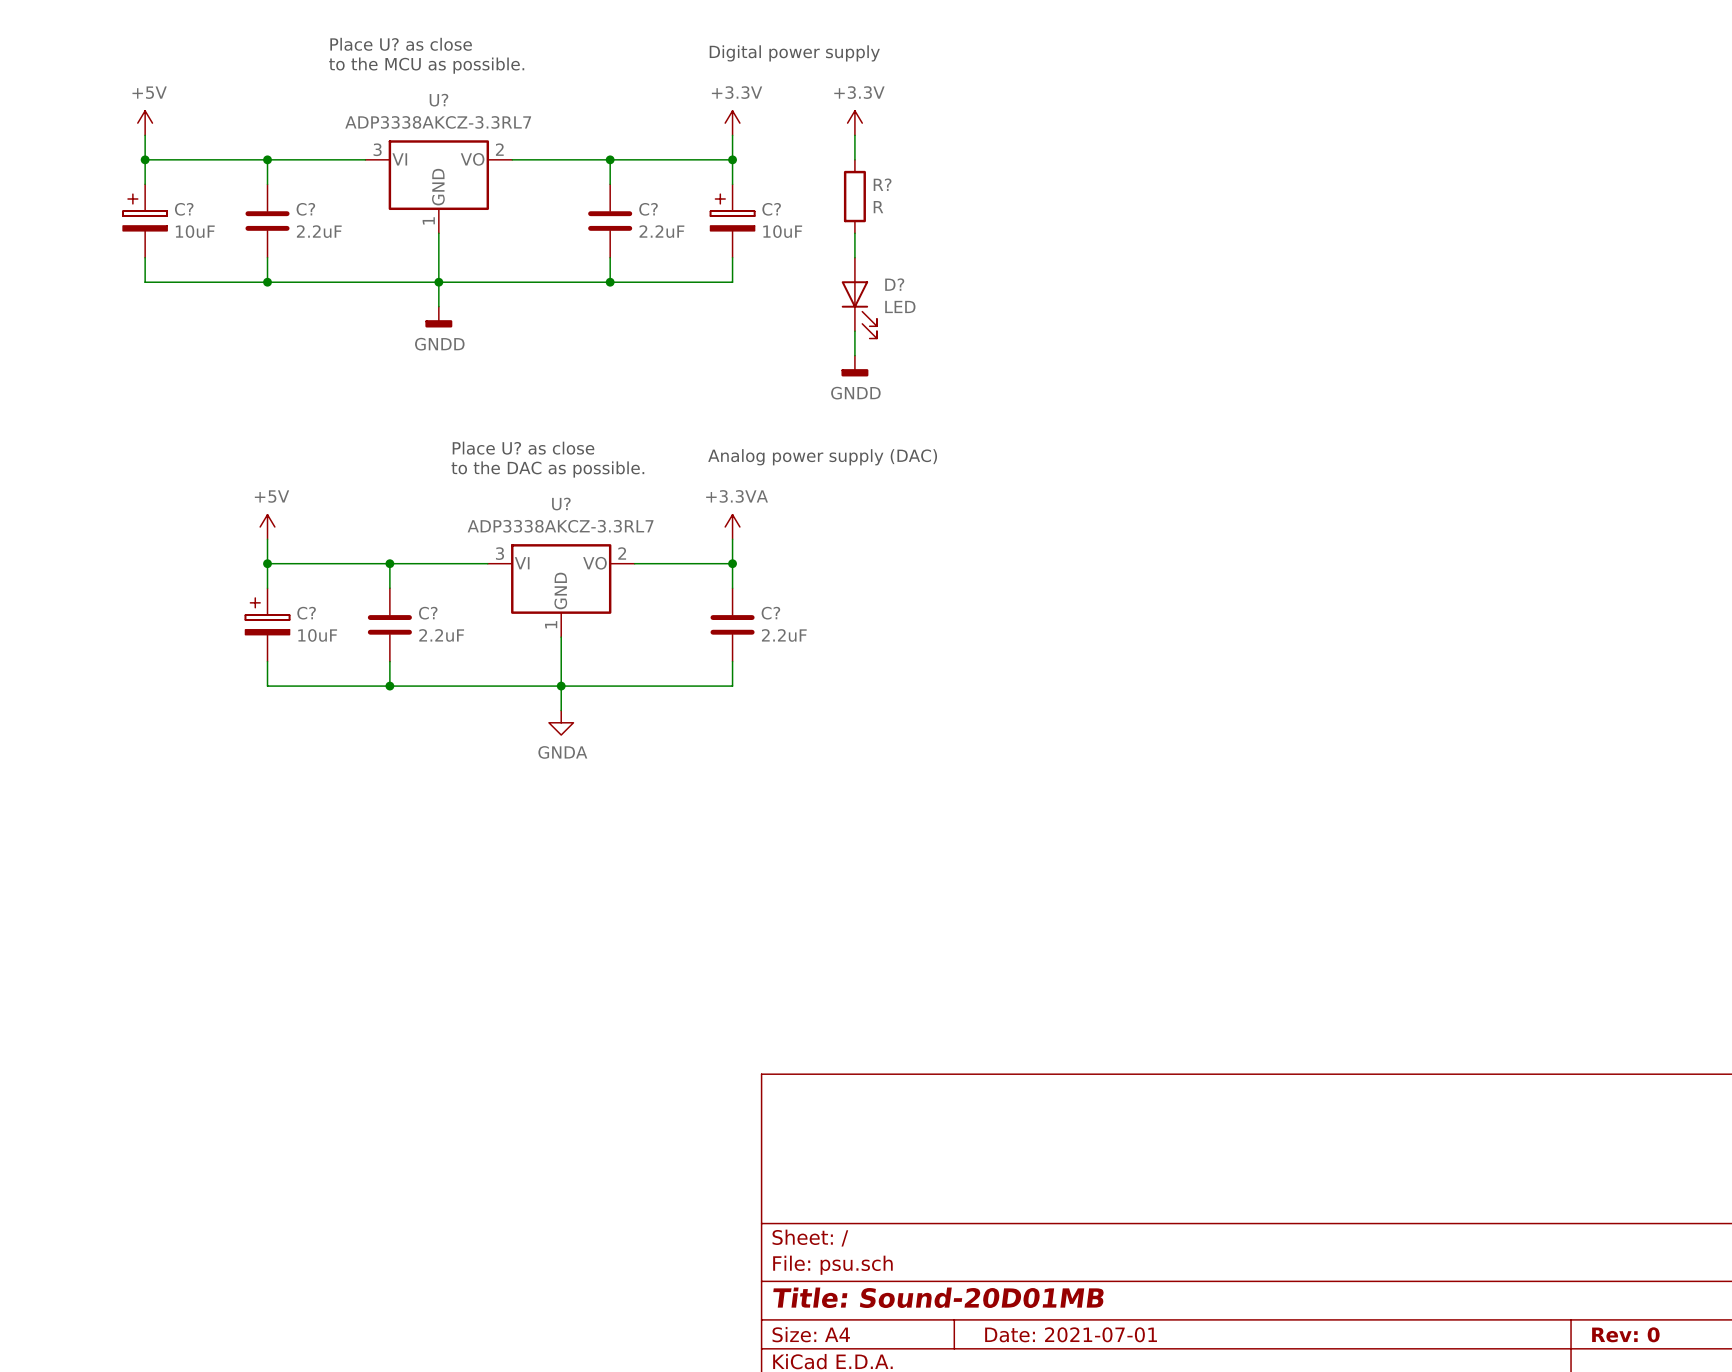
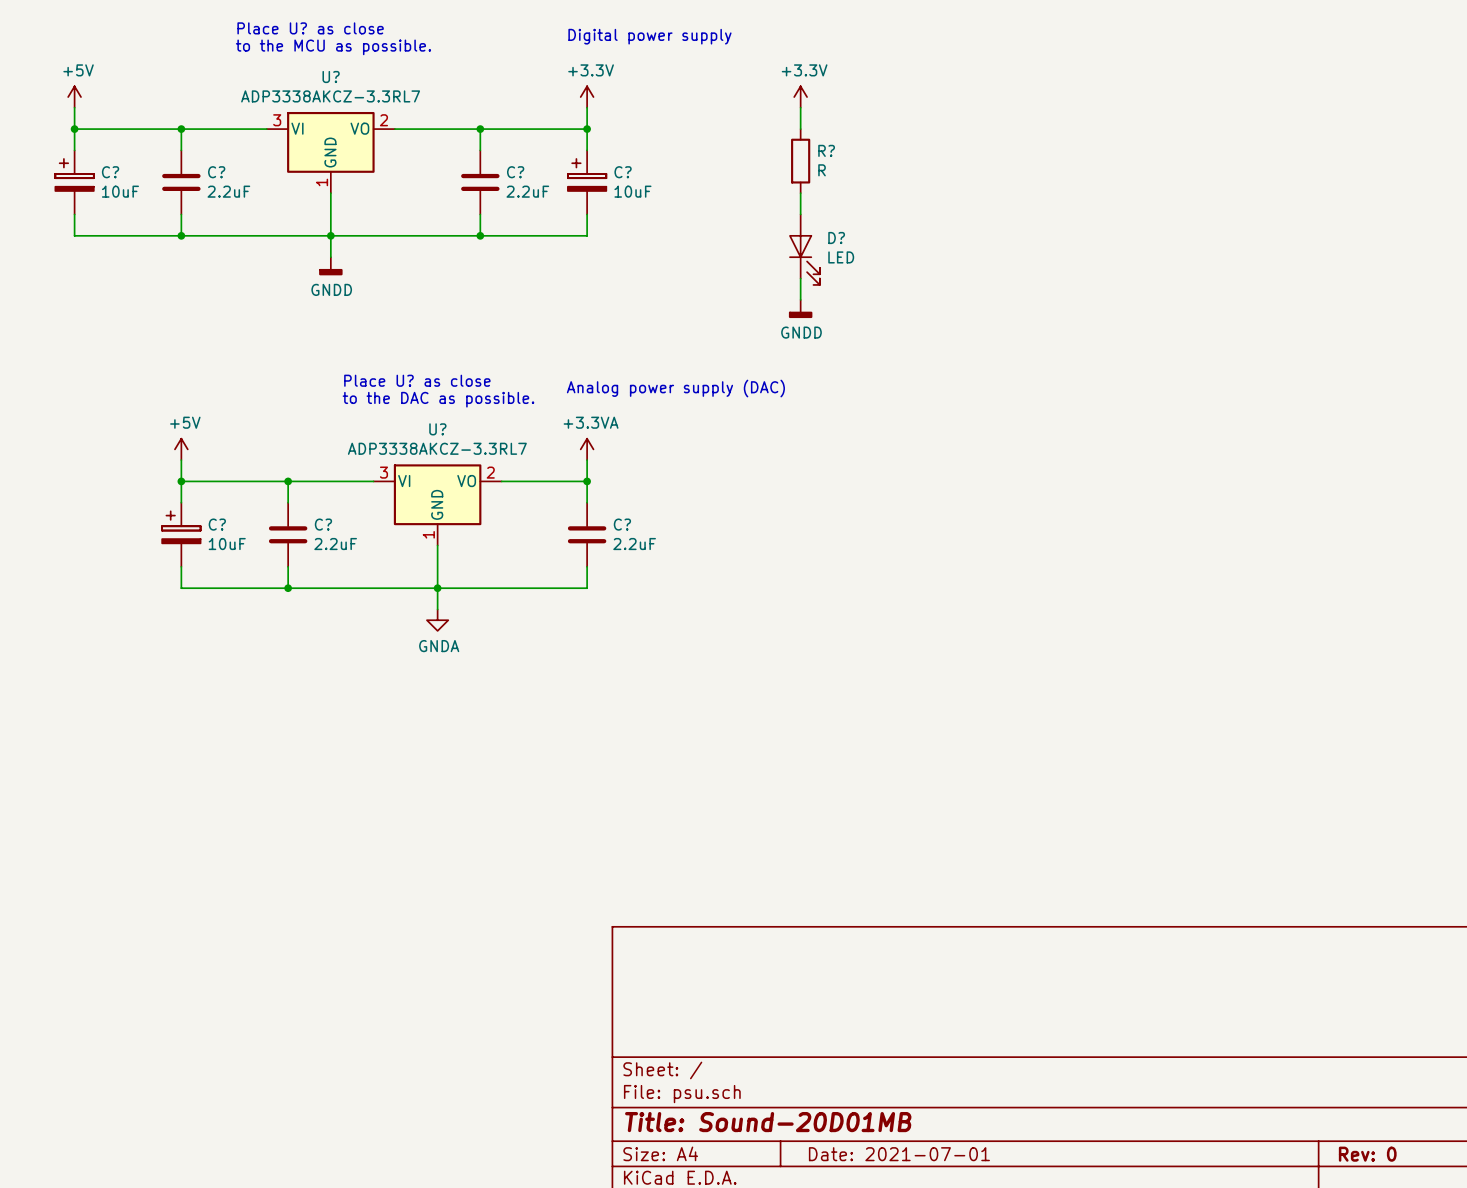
power symbol position: +3.3V (854, 123) -> +3.3V (800, 97)
wire: (854, 135) (854, 159) -> (800, 107) (800, 129)
R? position: (854, 196) -> (800, 161)
wire: (854, 233) (854, 257) -> (800, 193) (800, 214)
D? position: (859, 298) -> (804, 249)
wire: (854, 331) (854, 355) -> (800, 278) (800, 299)
power symbol position: GNDD (854, 366) -> GNDD (800, 308)

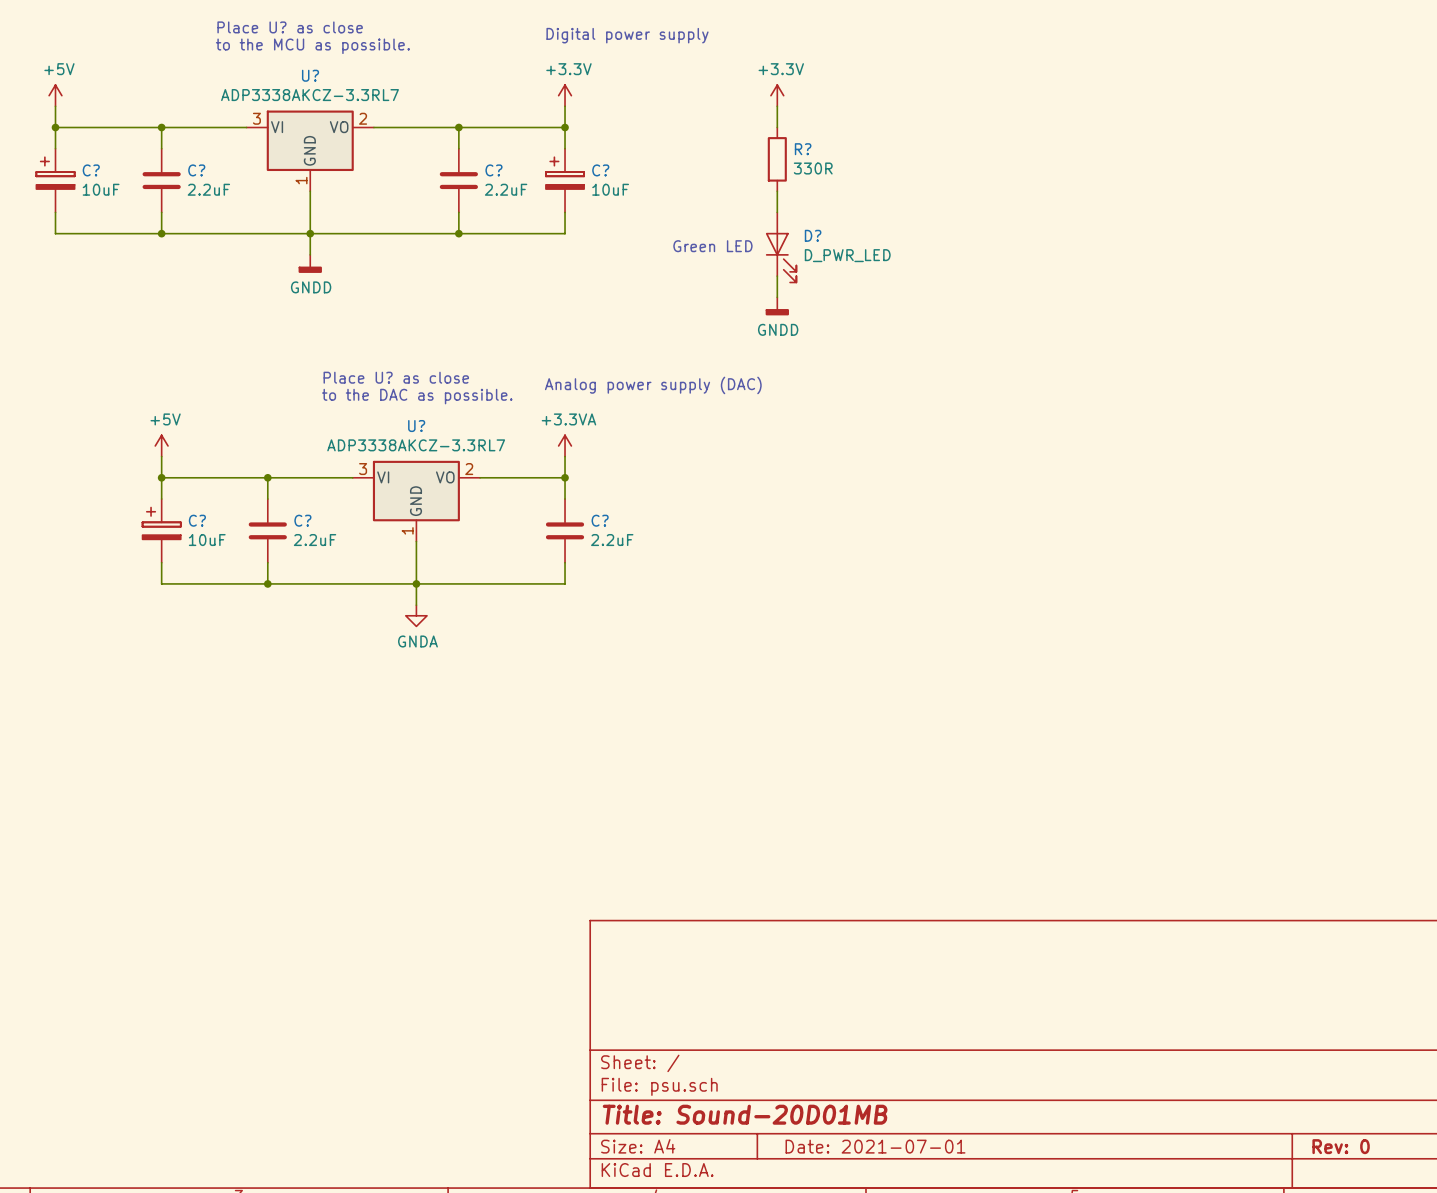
R? value: R (822, 170) -> 330R (813, 168)
text: none -> Green LED (712, 246)
D? value: LED (841, 257) -> D_PWR_LED (847, 255)

